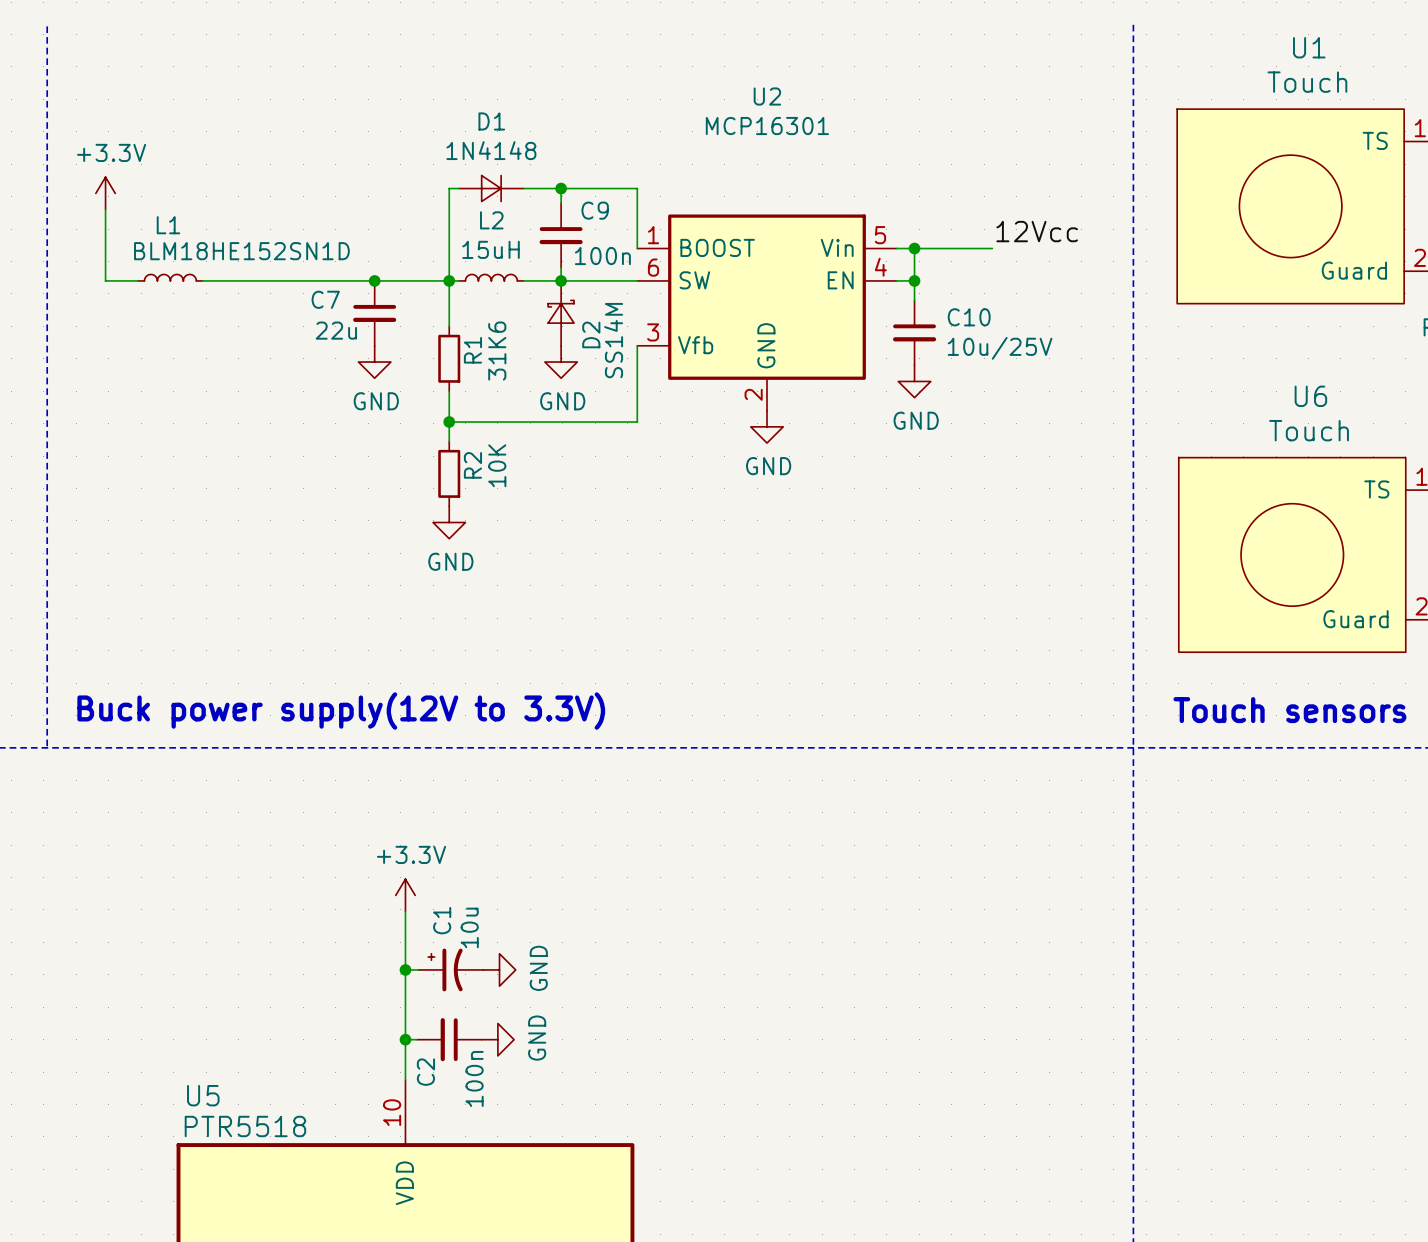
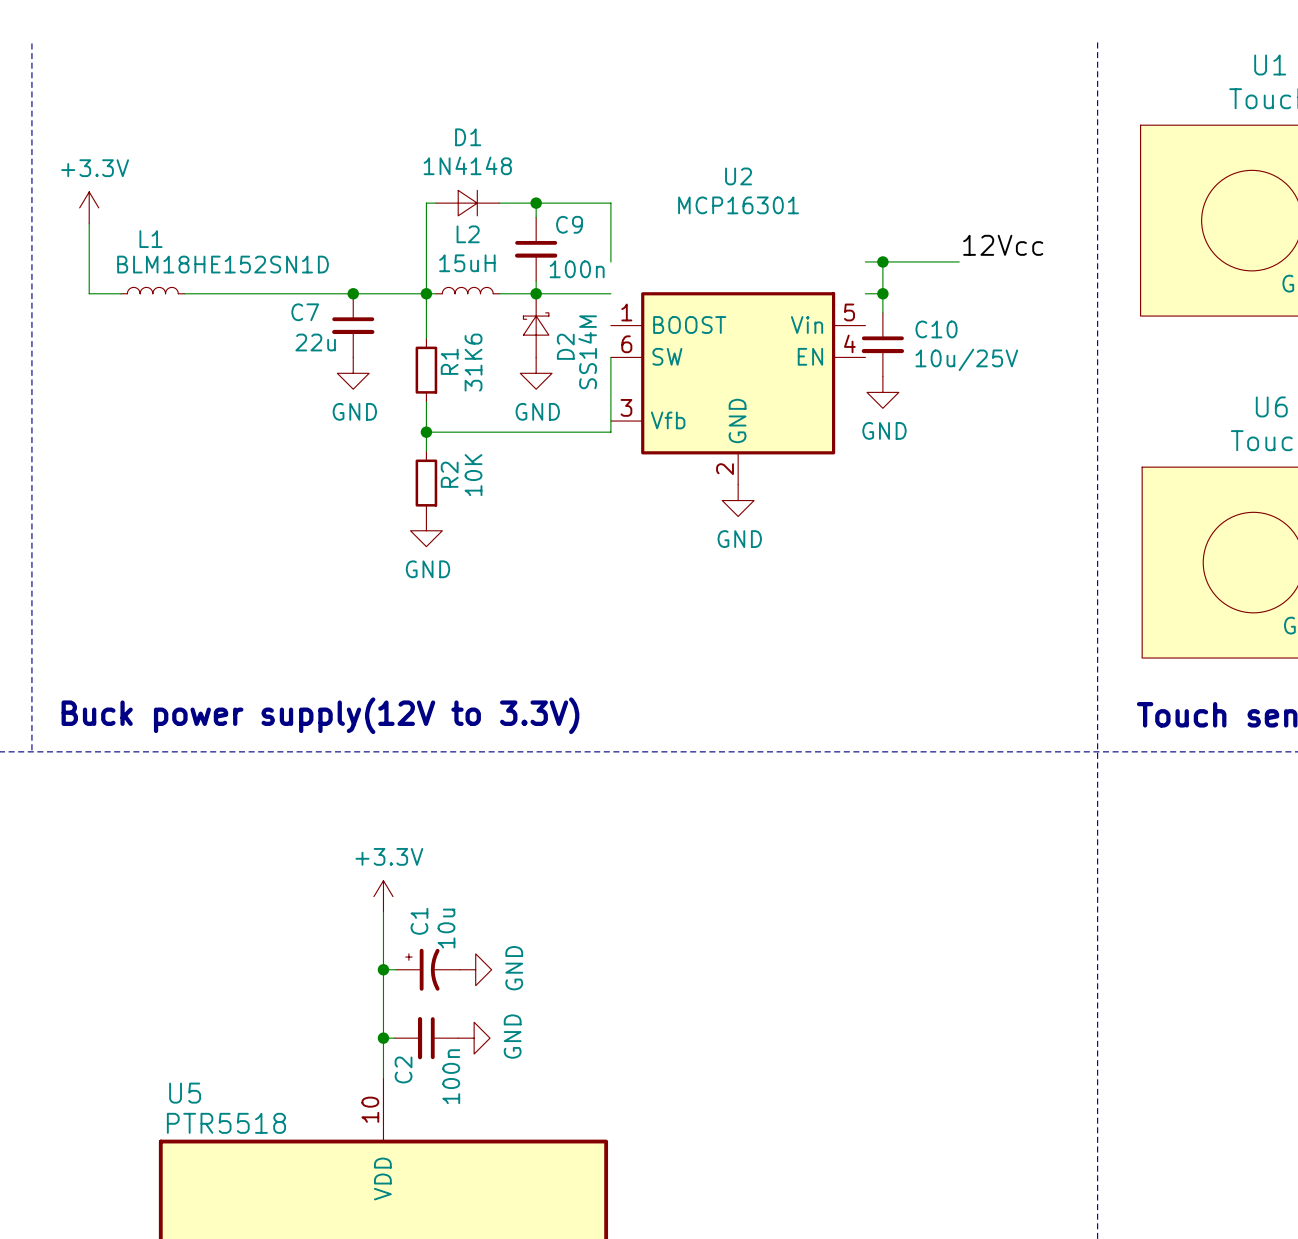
U2 position: (767, 312) -> (738, 388)
power symbol position: GND (767, 426) -> GND (738, 500)

